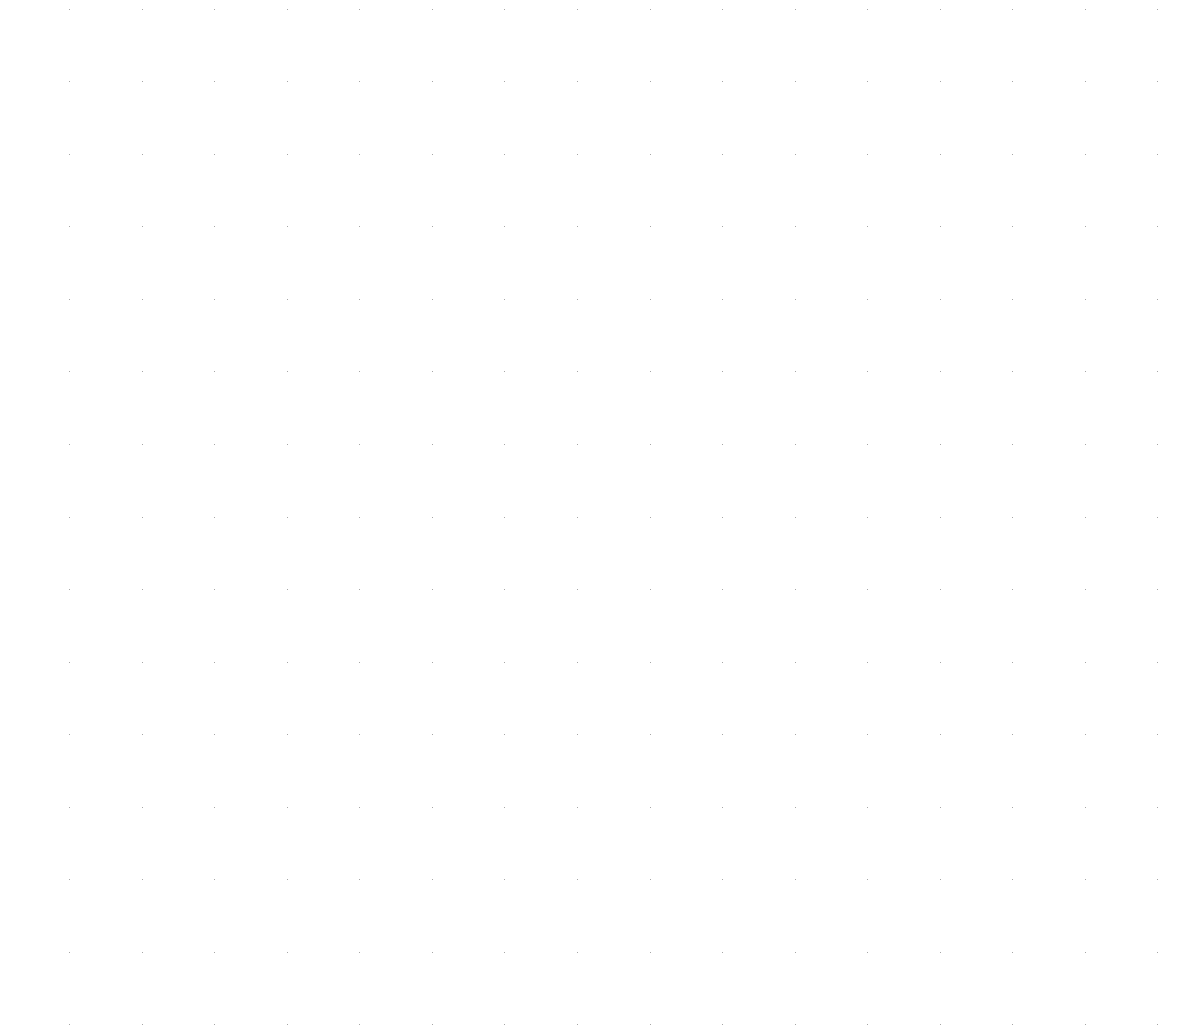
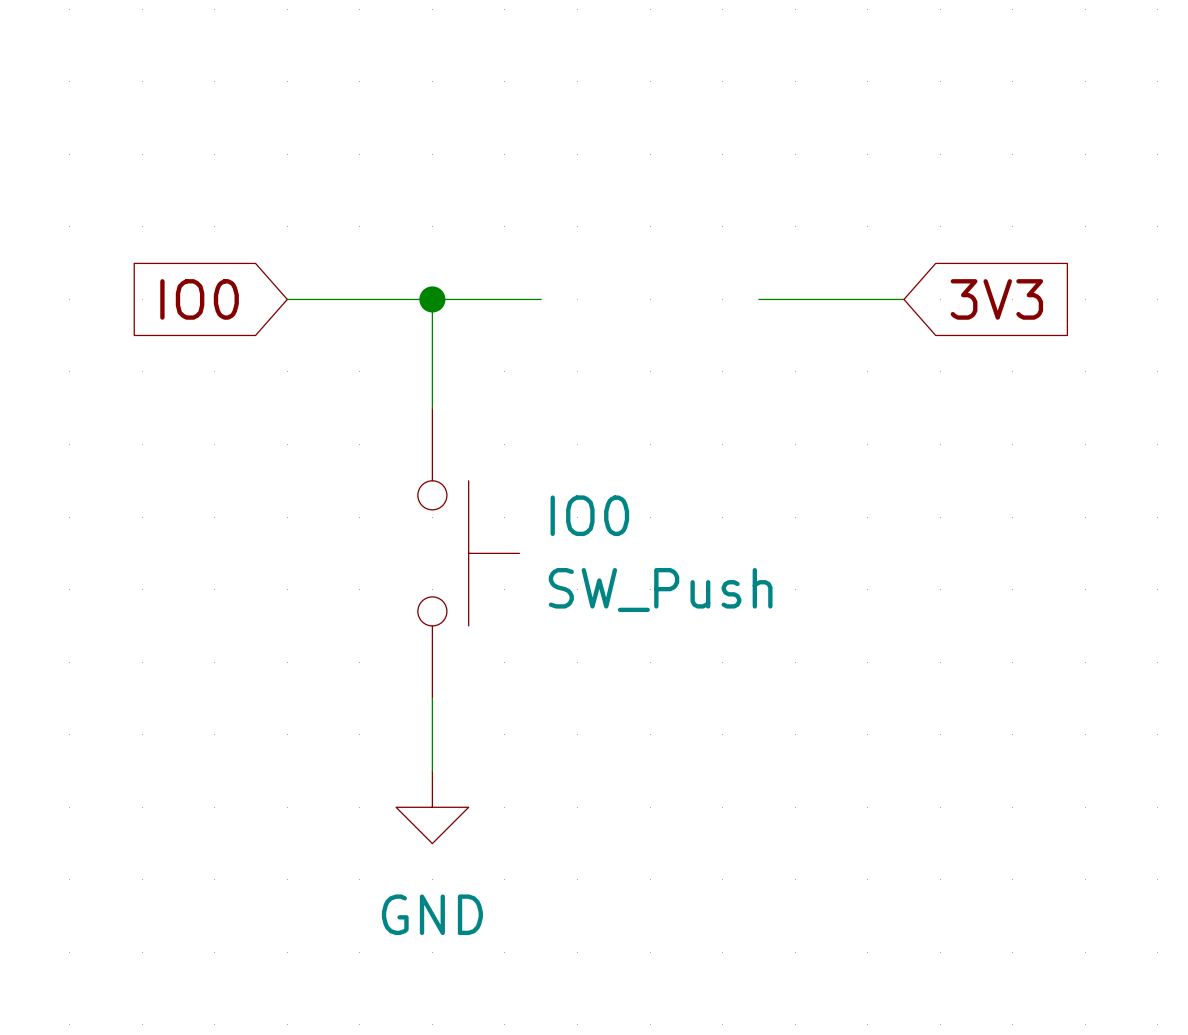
global label: none -> IO0 (199, 299)
wire: none -> (287, 299) (541, 299)
wire: none -> (432, 299) (432, 408)
junction: none -> (432, 299)
wire: none -> (758, 299) (903, 299)
global label: none -> 3V3 (996, 299)
IO0: none -> SW_Push (468, 553)
wire: none -> (432, 698) (432, 771)
power symbol: none -> GND (432, 807)

